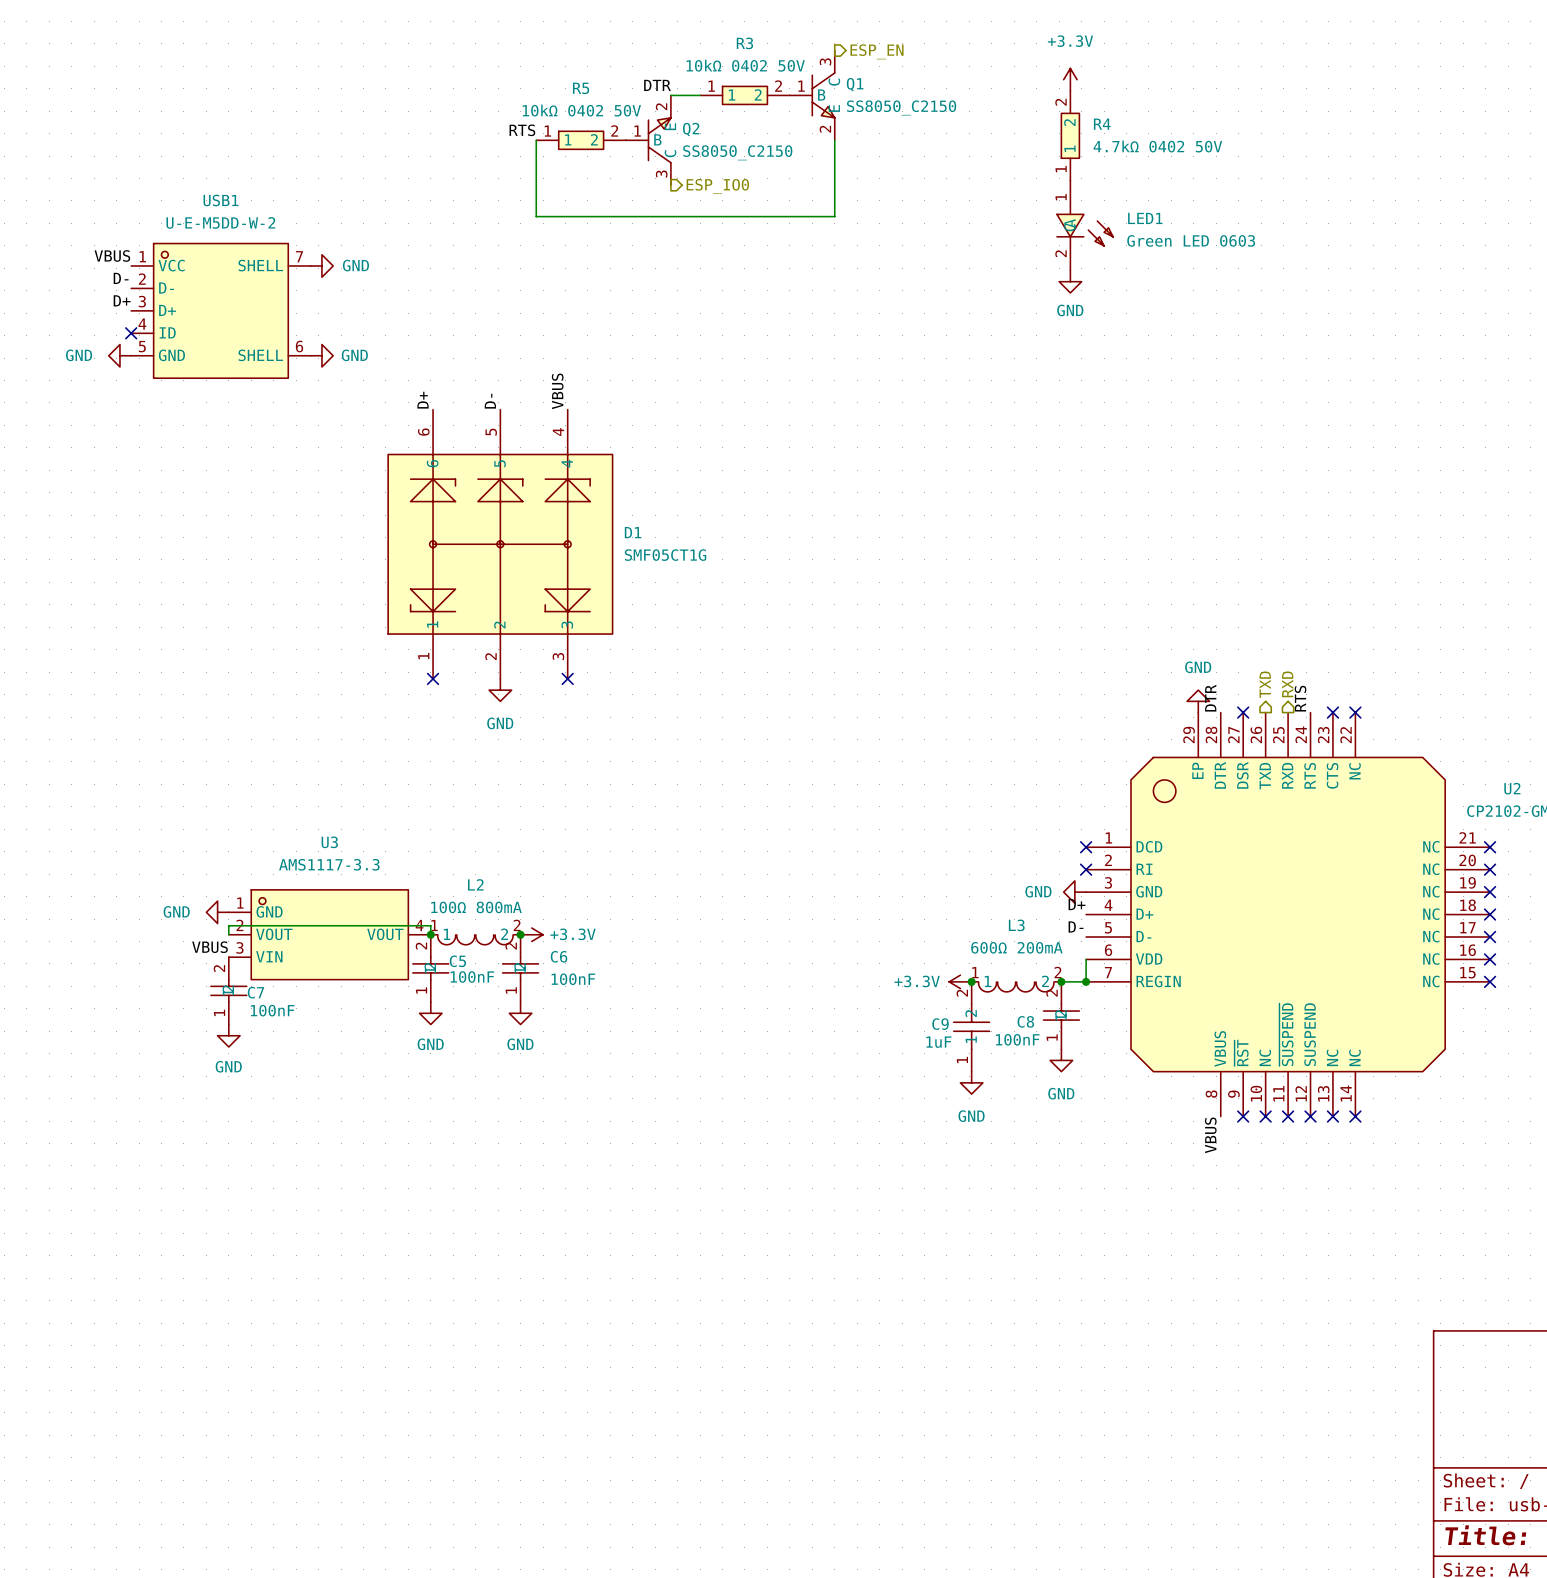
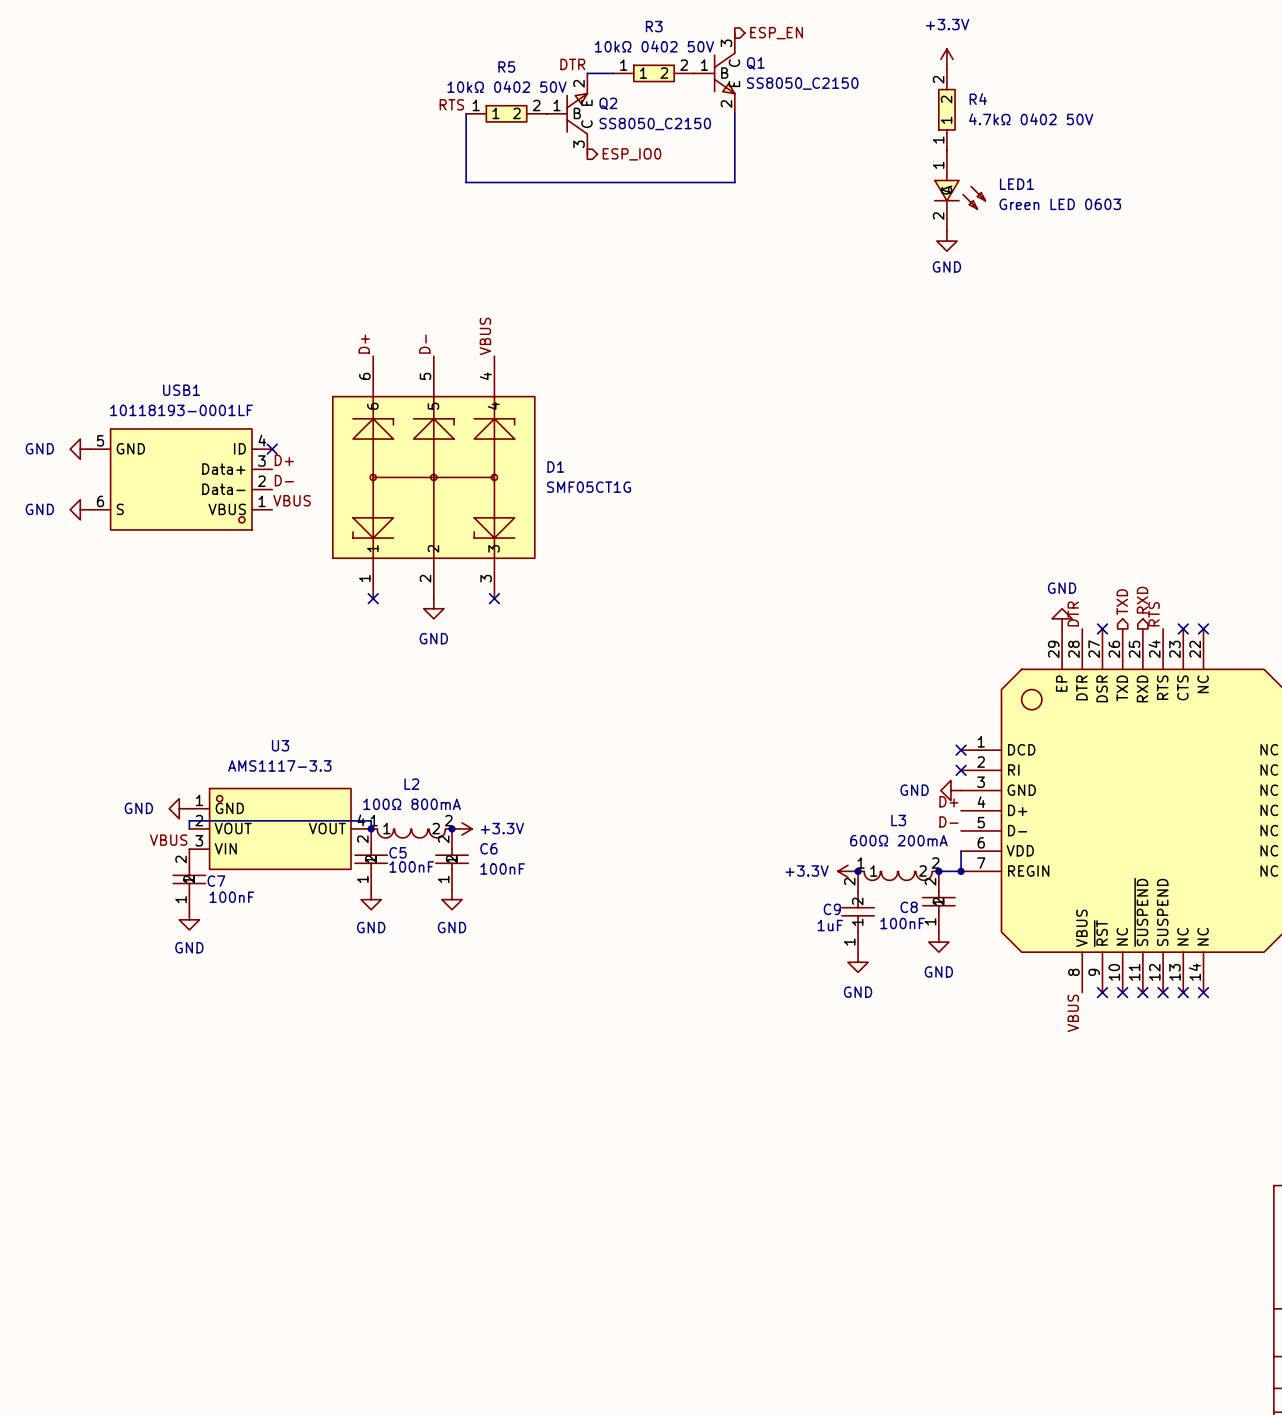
USB1 value: U-E-M5DD-W-2 (220, 222) -> 10118193-0001LF (181, 410)
USB1 symbol: [131, 243, 311, 379] -> [90, 428, 273, 530]
label: VBUS (112, 255) -> none
power symbol: GND (321, 265) -> none
label: D- (121, 278) -> none
label: D+ (122, 300) -> none
no-connect mark: (131, 333) -> none
power symbol: GND (119, 355) -> none
power symbol: GND (321, 355) -> none
power symbol: none -> GND (80, 449)
no-connect mark: none -> (272, 449)
label: none -> D+ (284, 460)
label: none -> D- (284, 480)
label: none -> VBUS (292, 500)
power symbol: none -> GND (80, 509)

